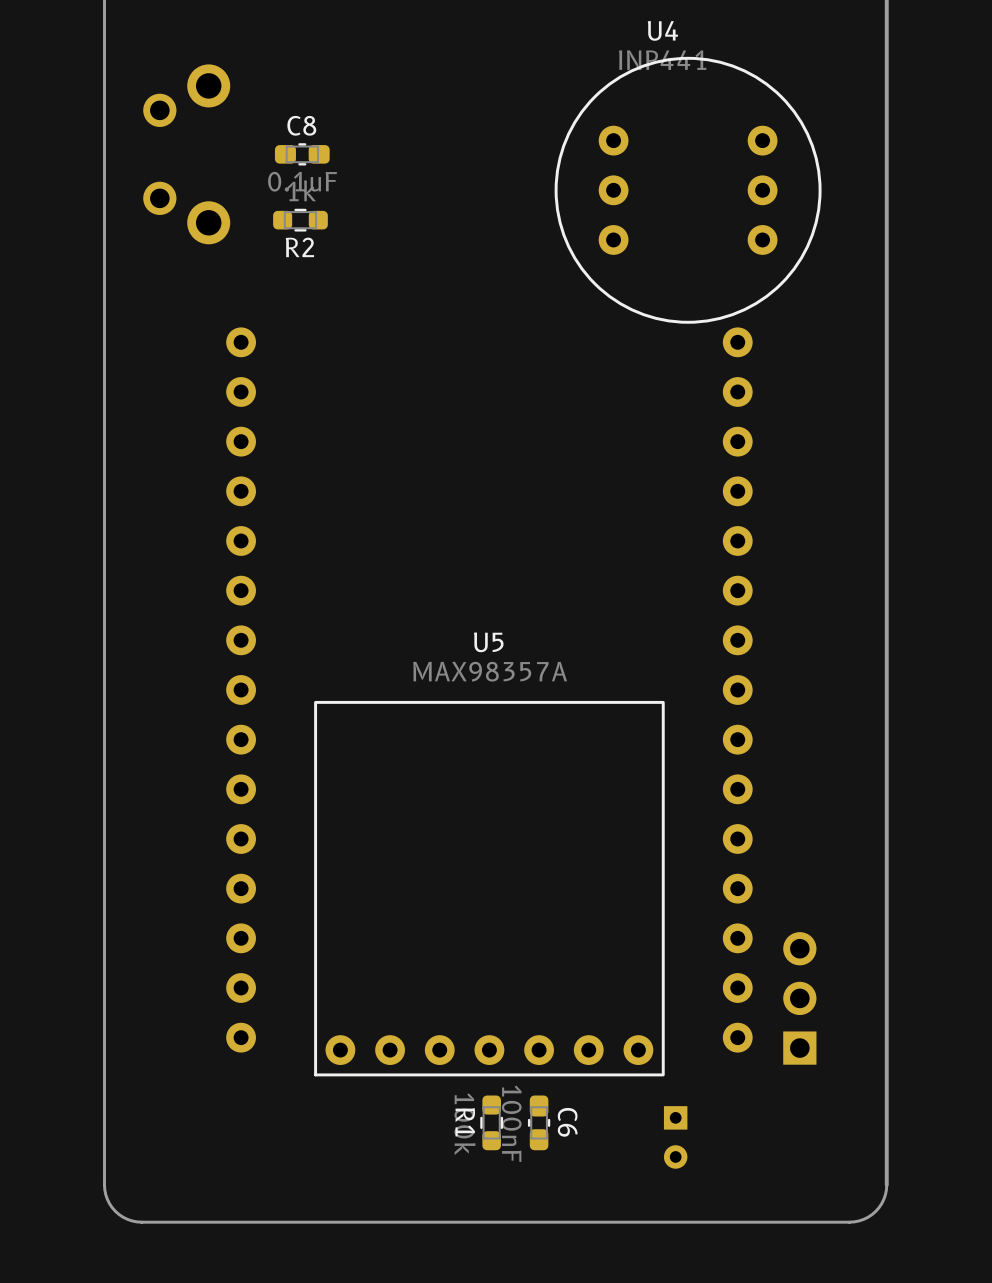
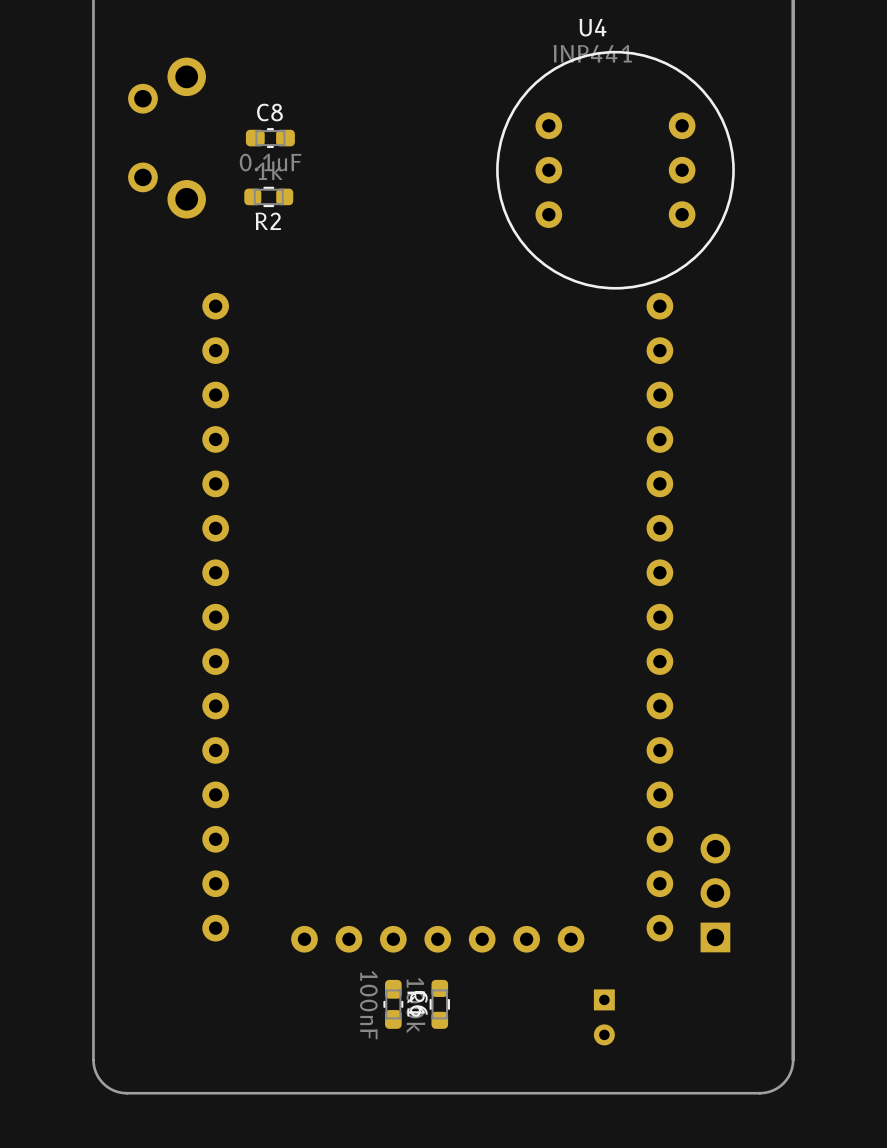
U5 side: bottom (489, 888) -> top (437, 939)
C6 position: (539, 1122) -> (393, 1004)

